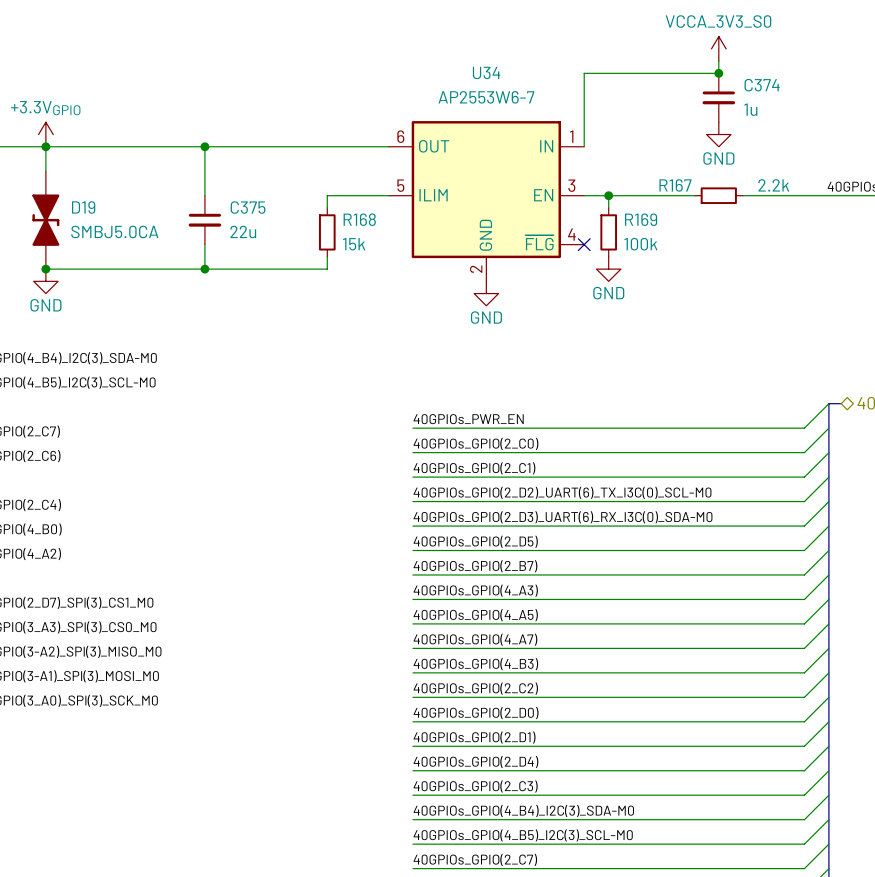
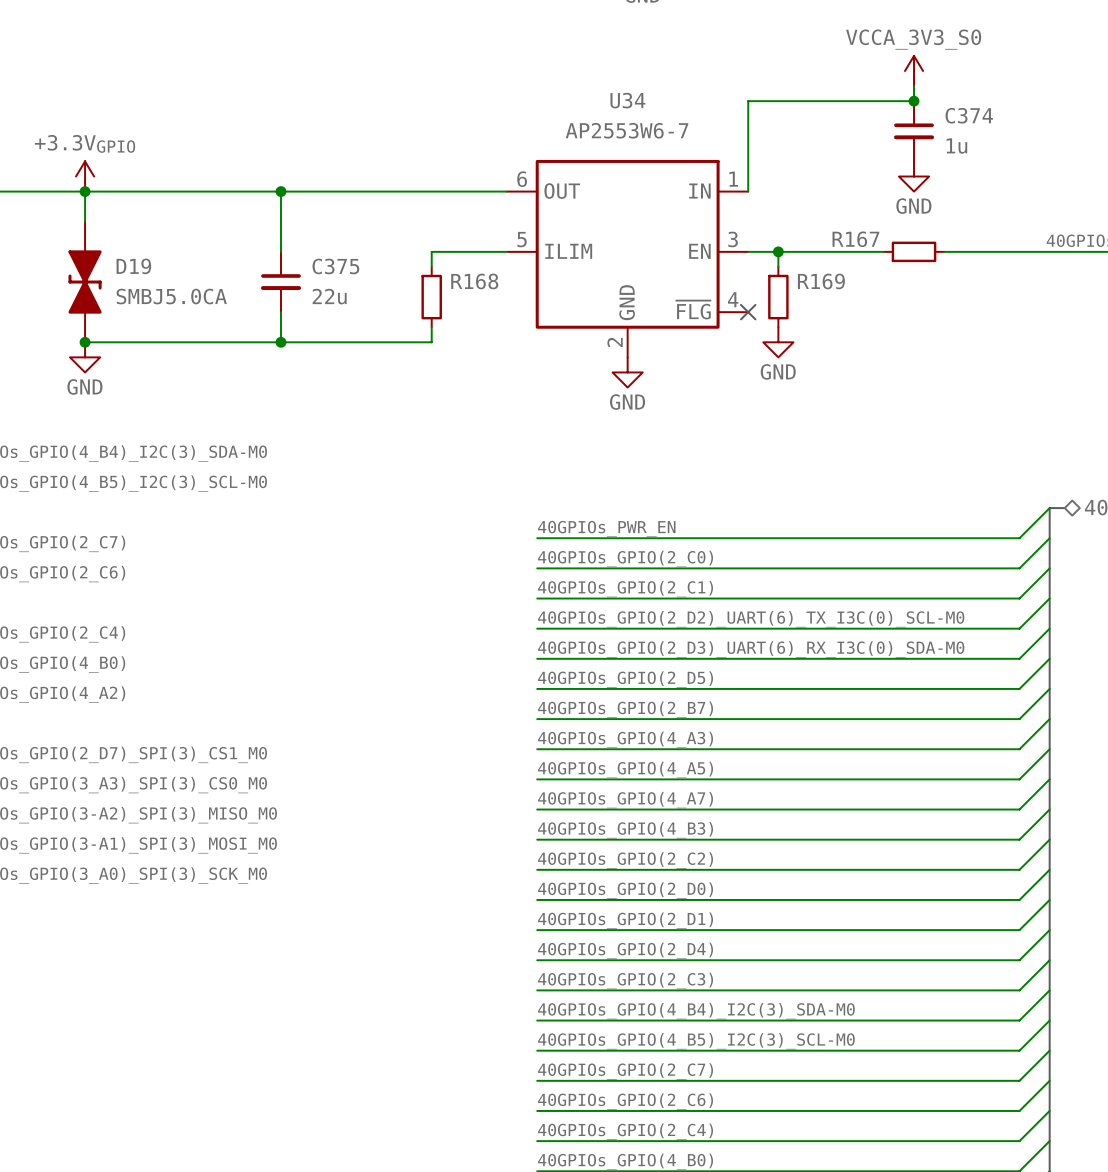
R167 value: 2.2k (773, 185) -> none
R168 value: 15k (354, 244) -> none
R169 value: 100k (640, 244) -> none

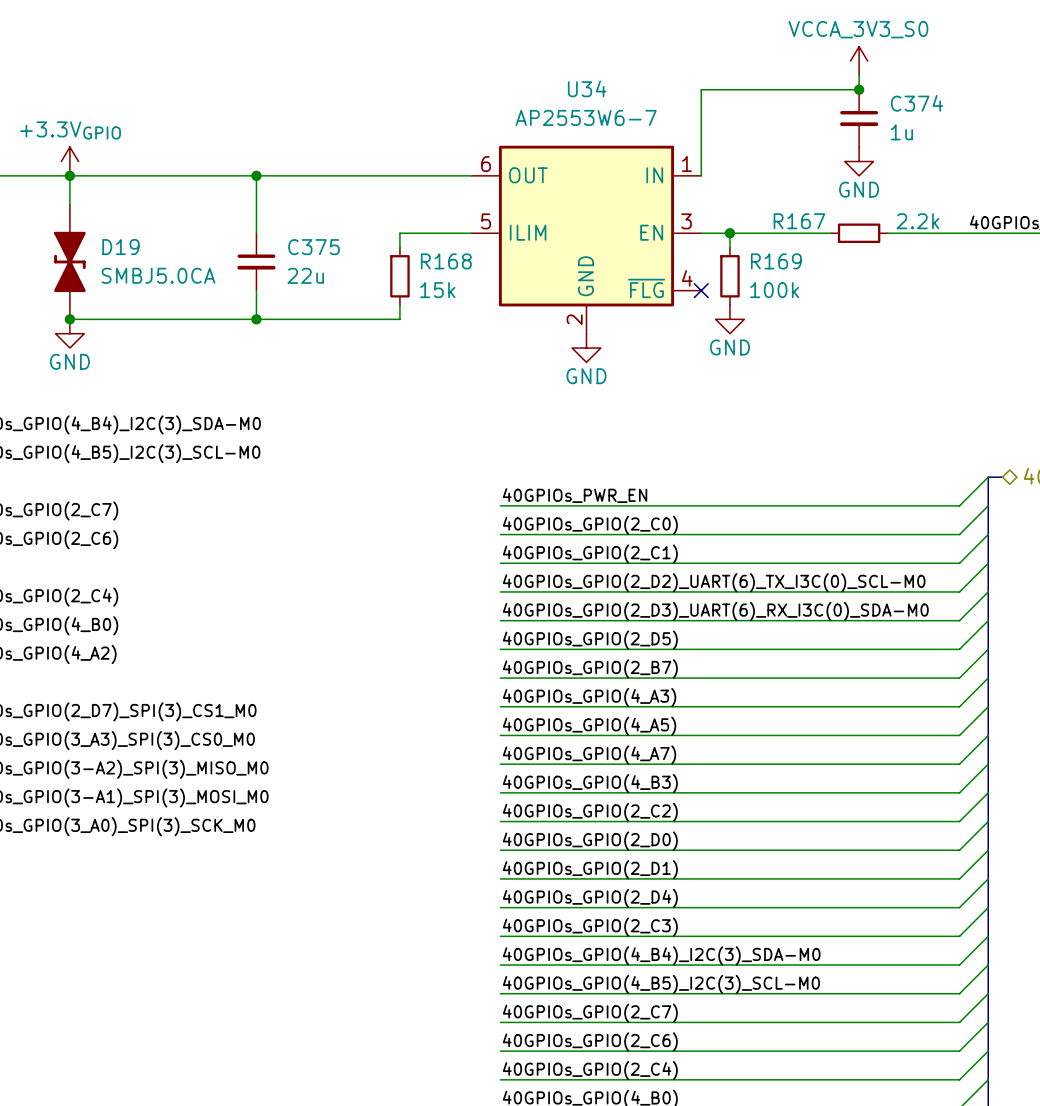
R167 value: none -> 2.2k (917, 221)
R168 value: none -> 15k (437, 290)
R169 value: none -> 100k (774, 290)

